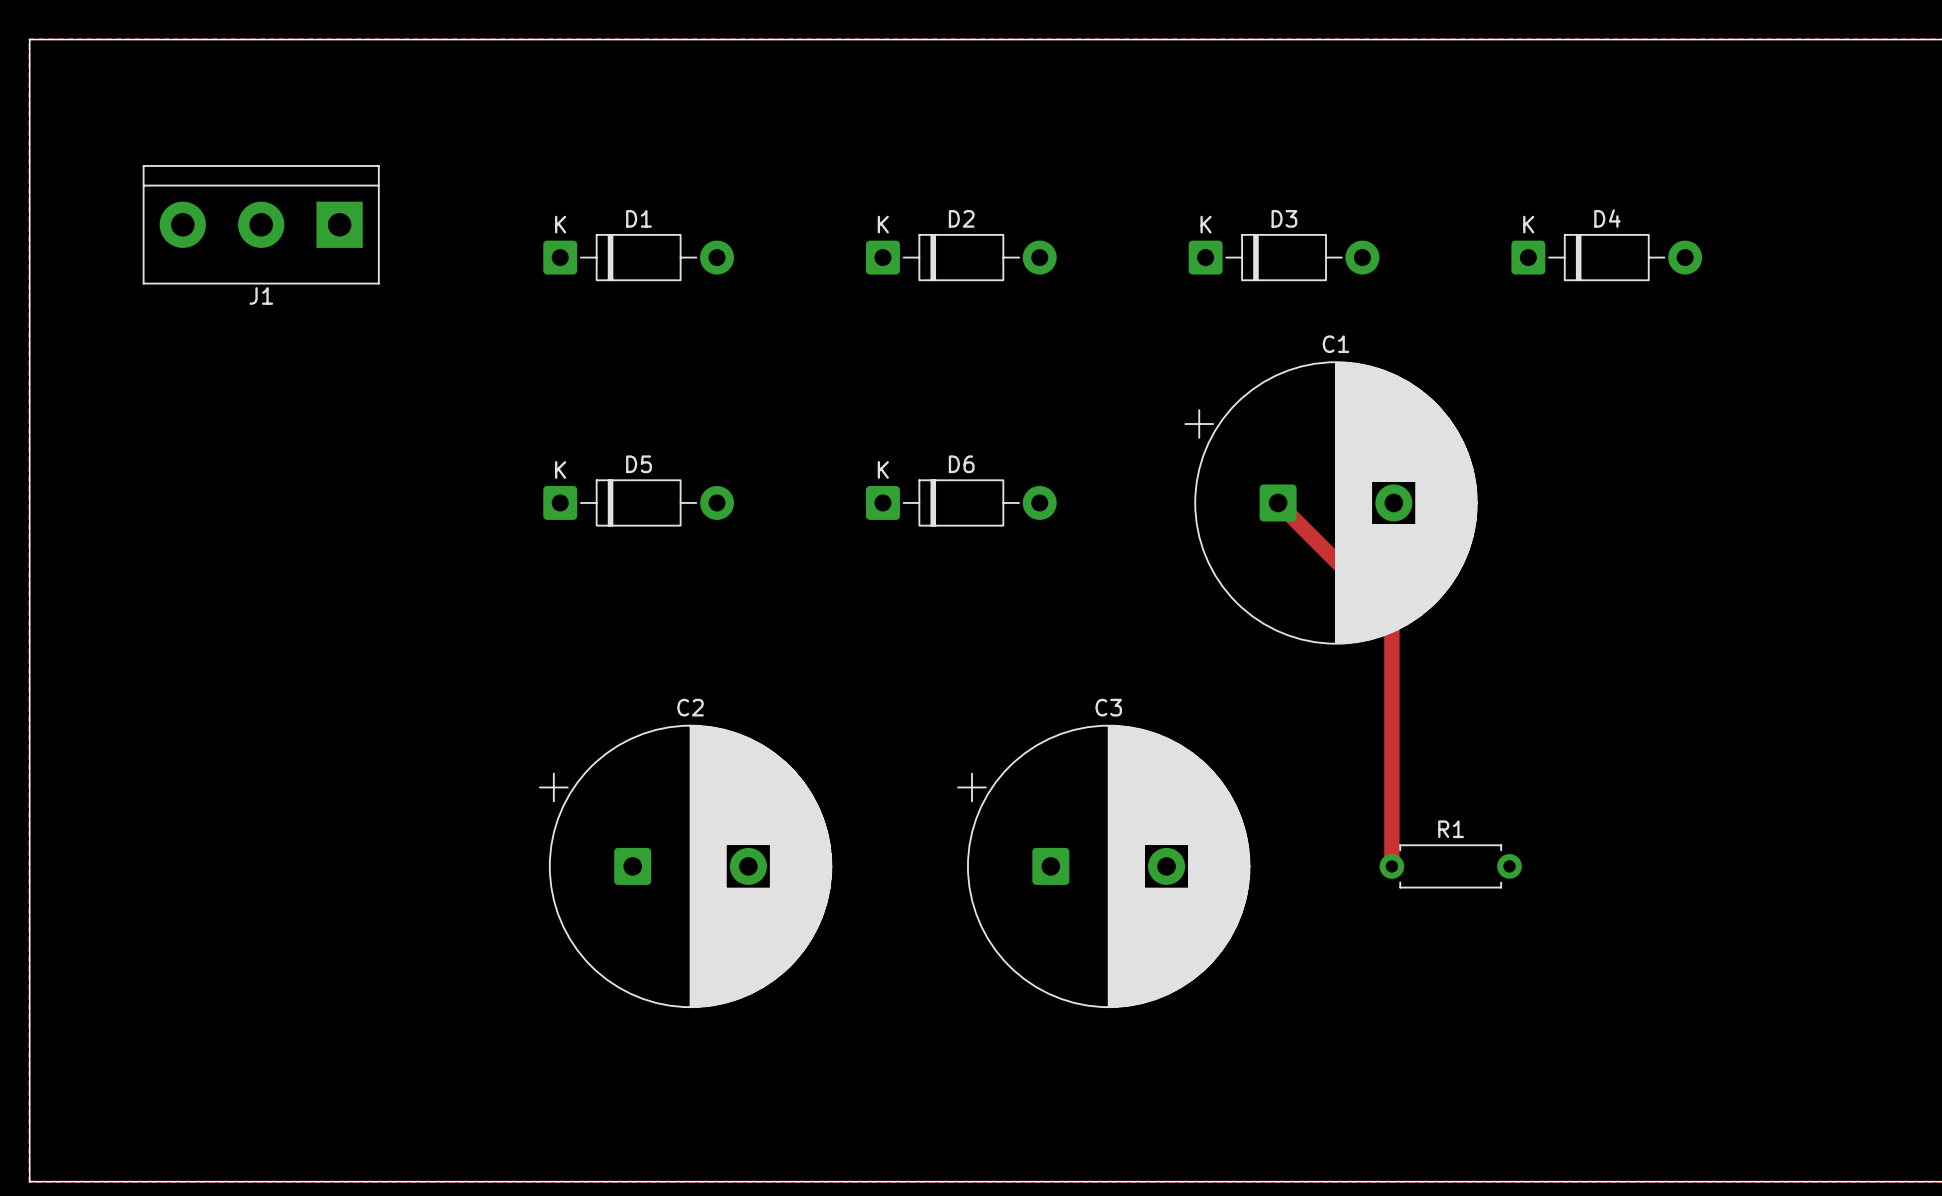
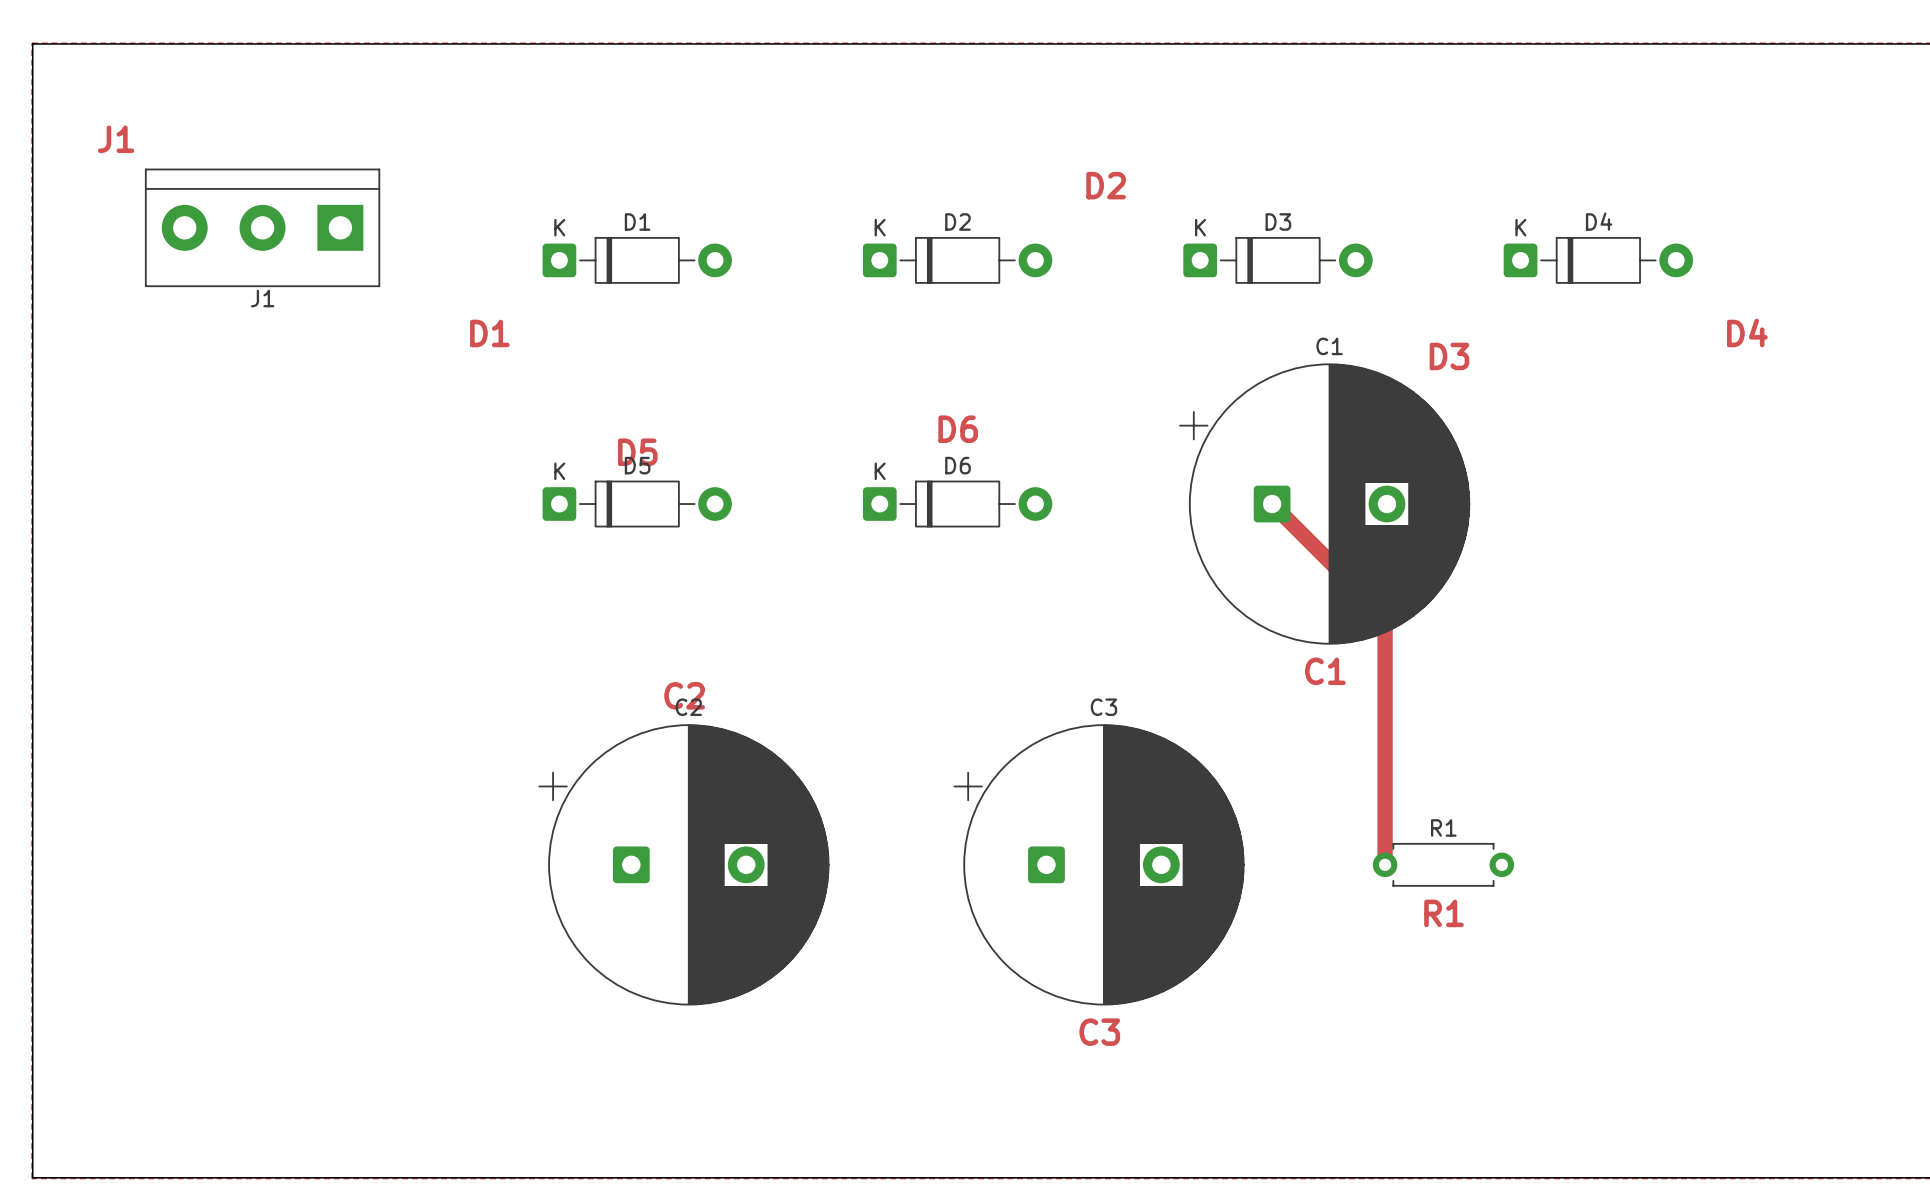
text: none -> J1 (116, 139)
text: none -> D2 (1106, 185)
text: none -> D4 (1747, 332)
text: none -> D1 (489, 333)
text: none -> D3 (1449, 356)
text: none -> D6 (958, 429)
text: none -> D5 (637, 452)
text: none -> C1 (1325, 671)
text: none -> C2 (684, 695)
text: none -> R1 (1444, 913)
text: none -> C3 (1099, 1032)

